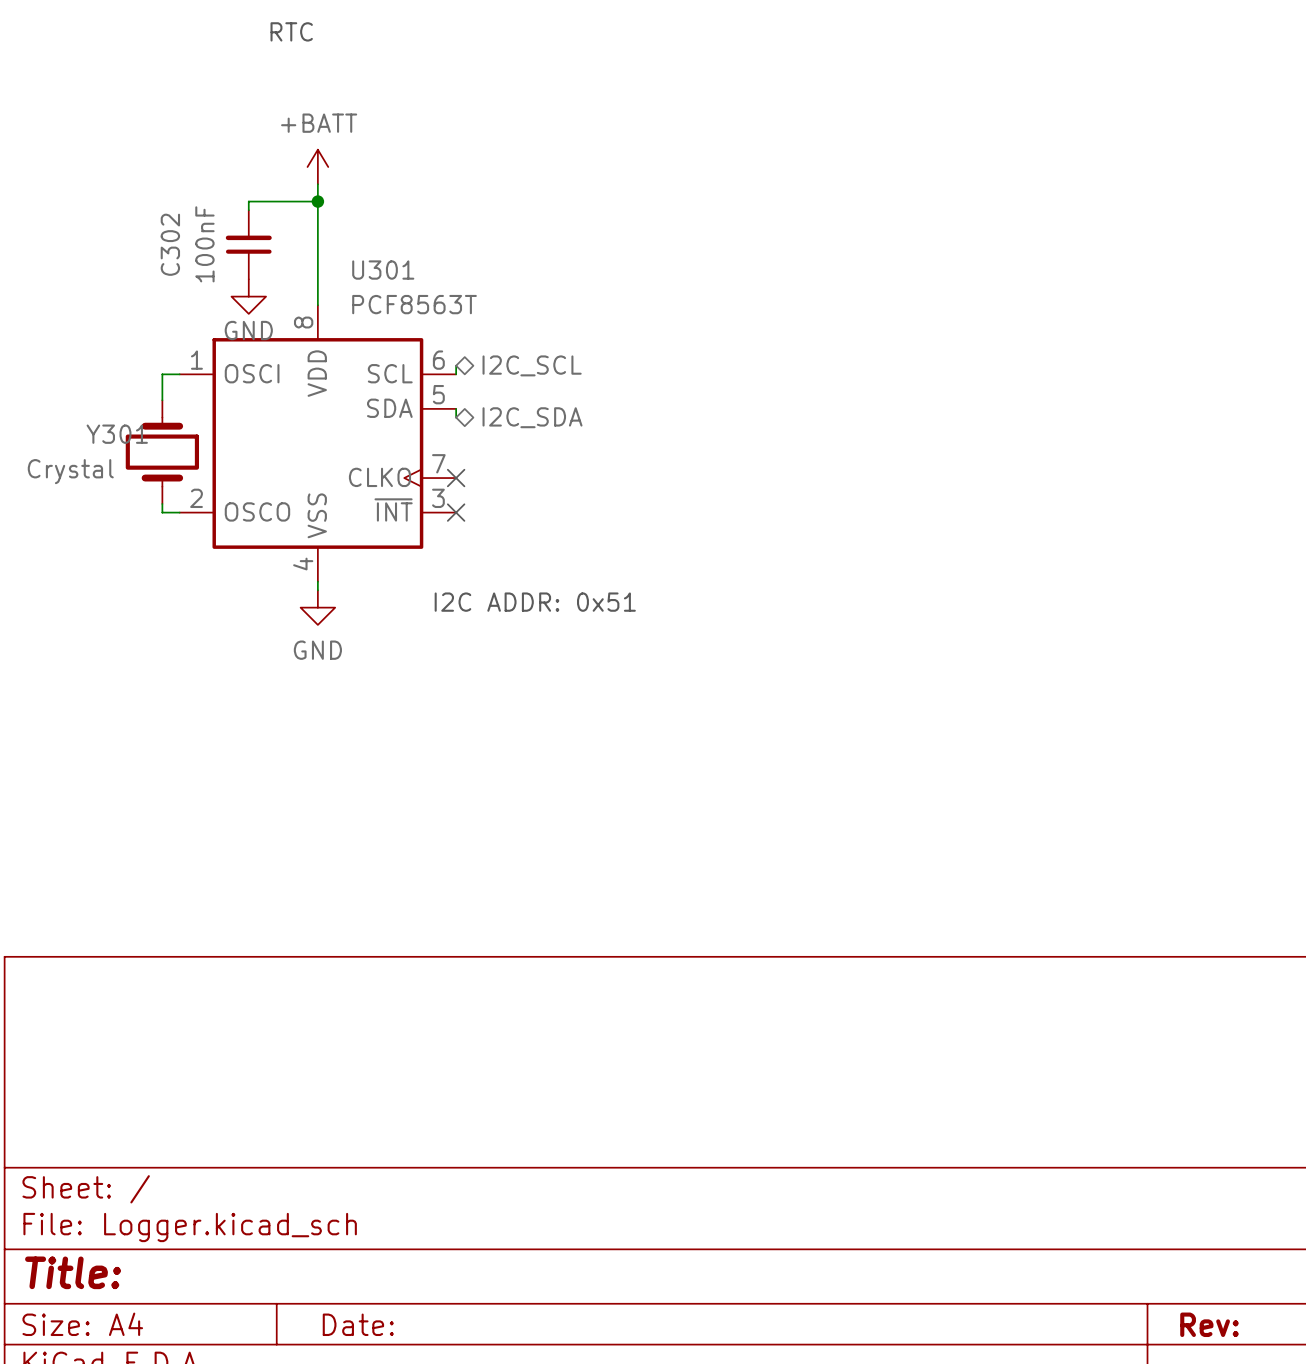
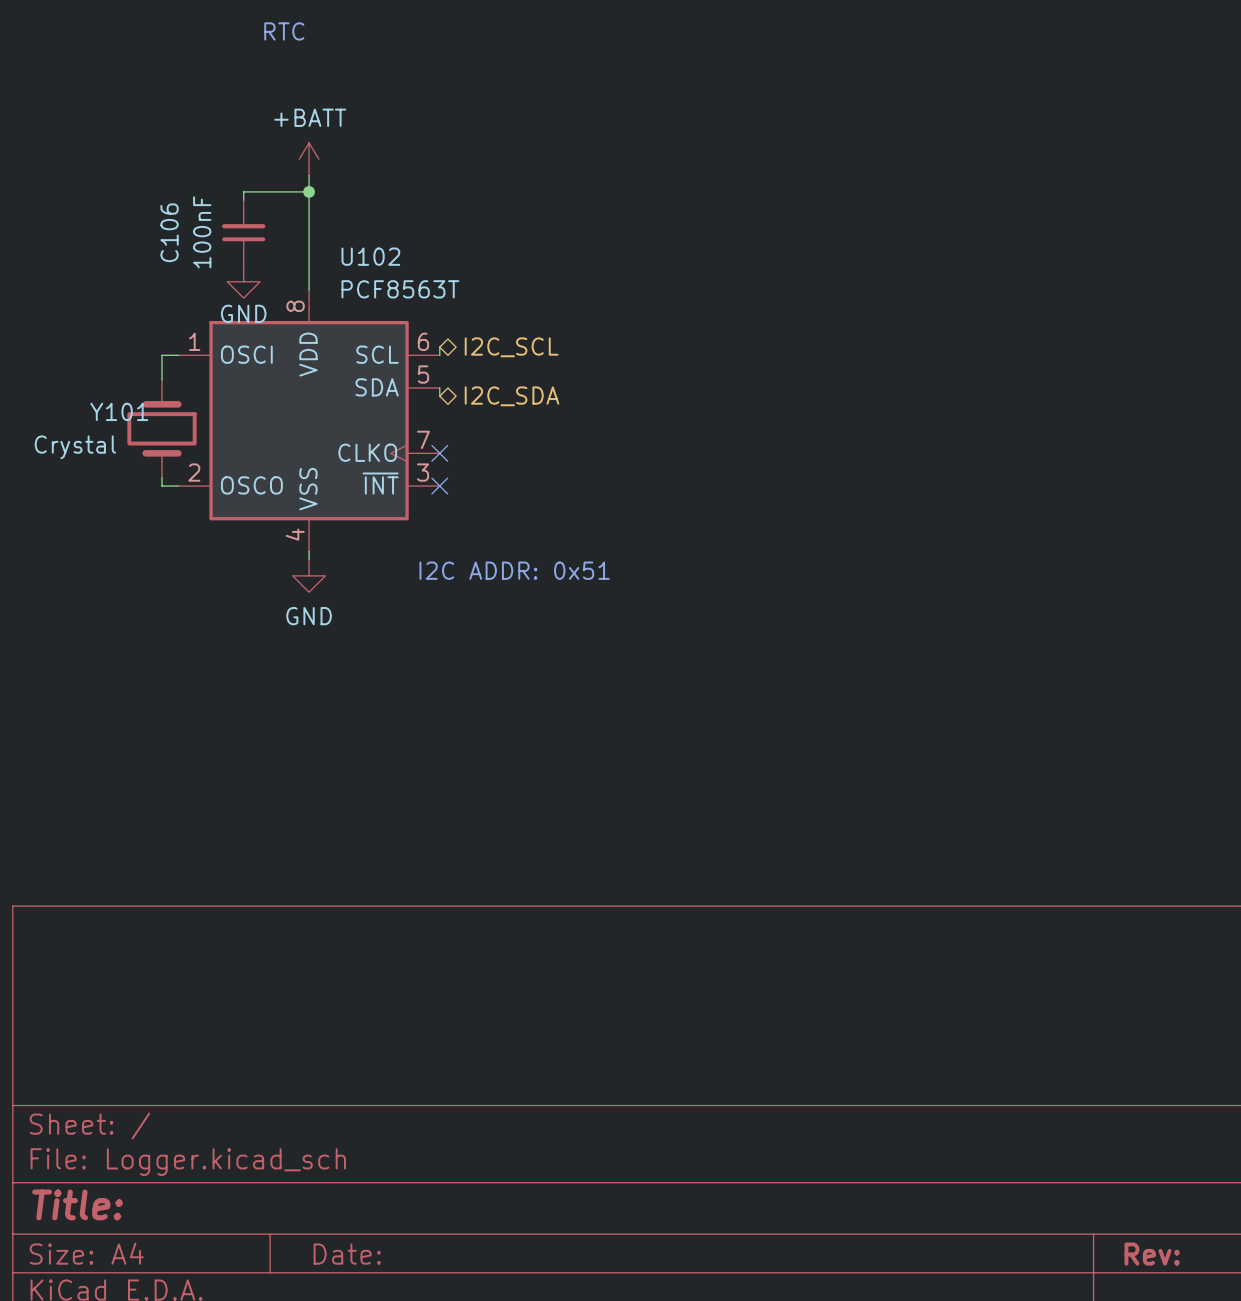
C302 name: C302 (170, 244) -> C106 (169, 232)
U301 name: U301 (383, 270) -> U102 (370, 256)
Y301 name: Y301 (117, 434) -> Y101 (119, 411)

